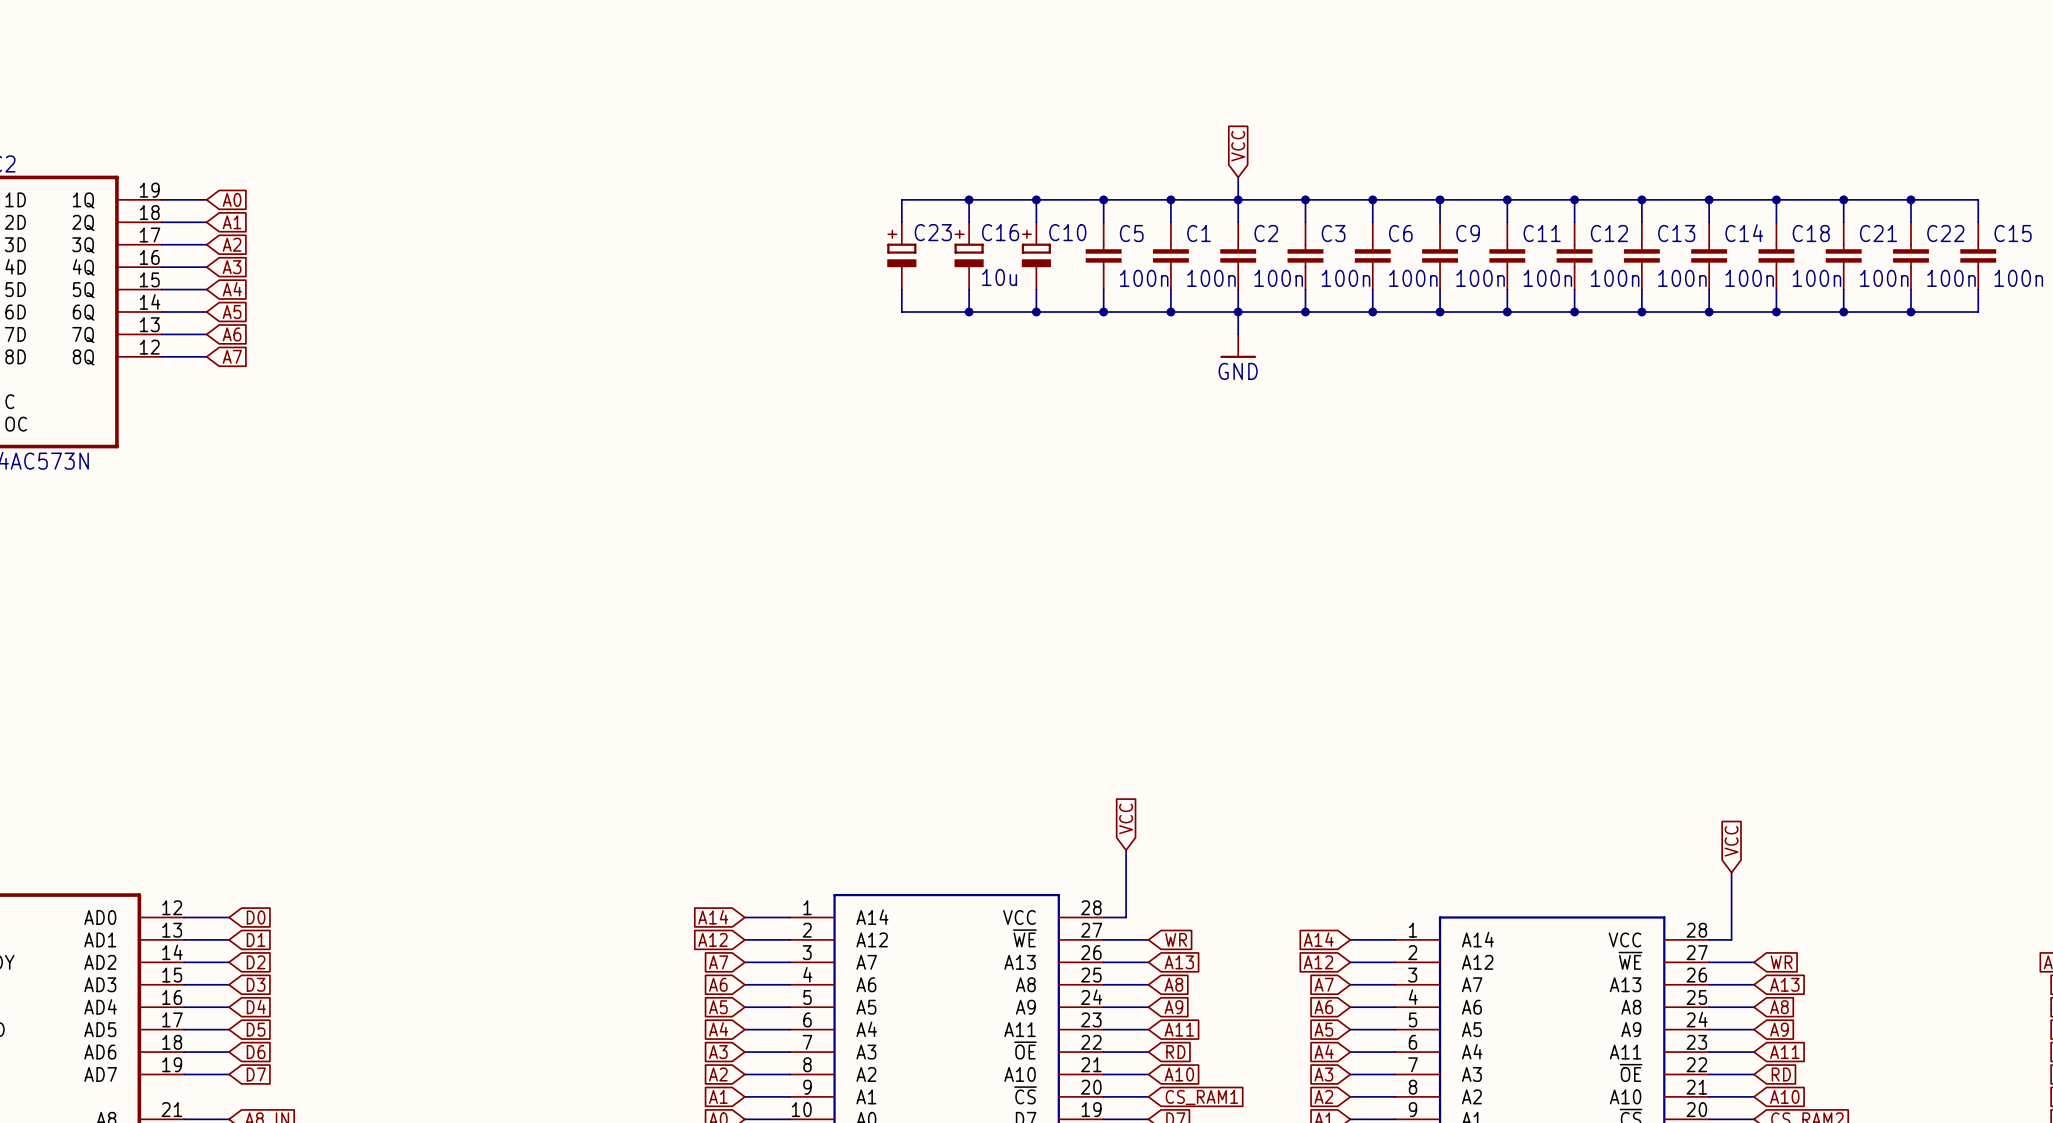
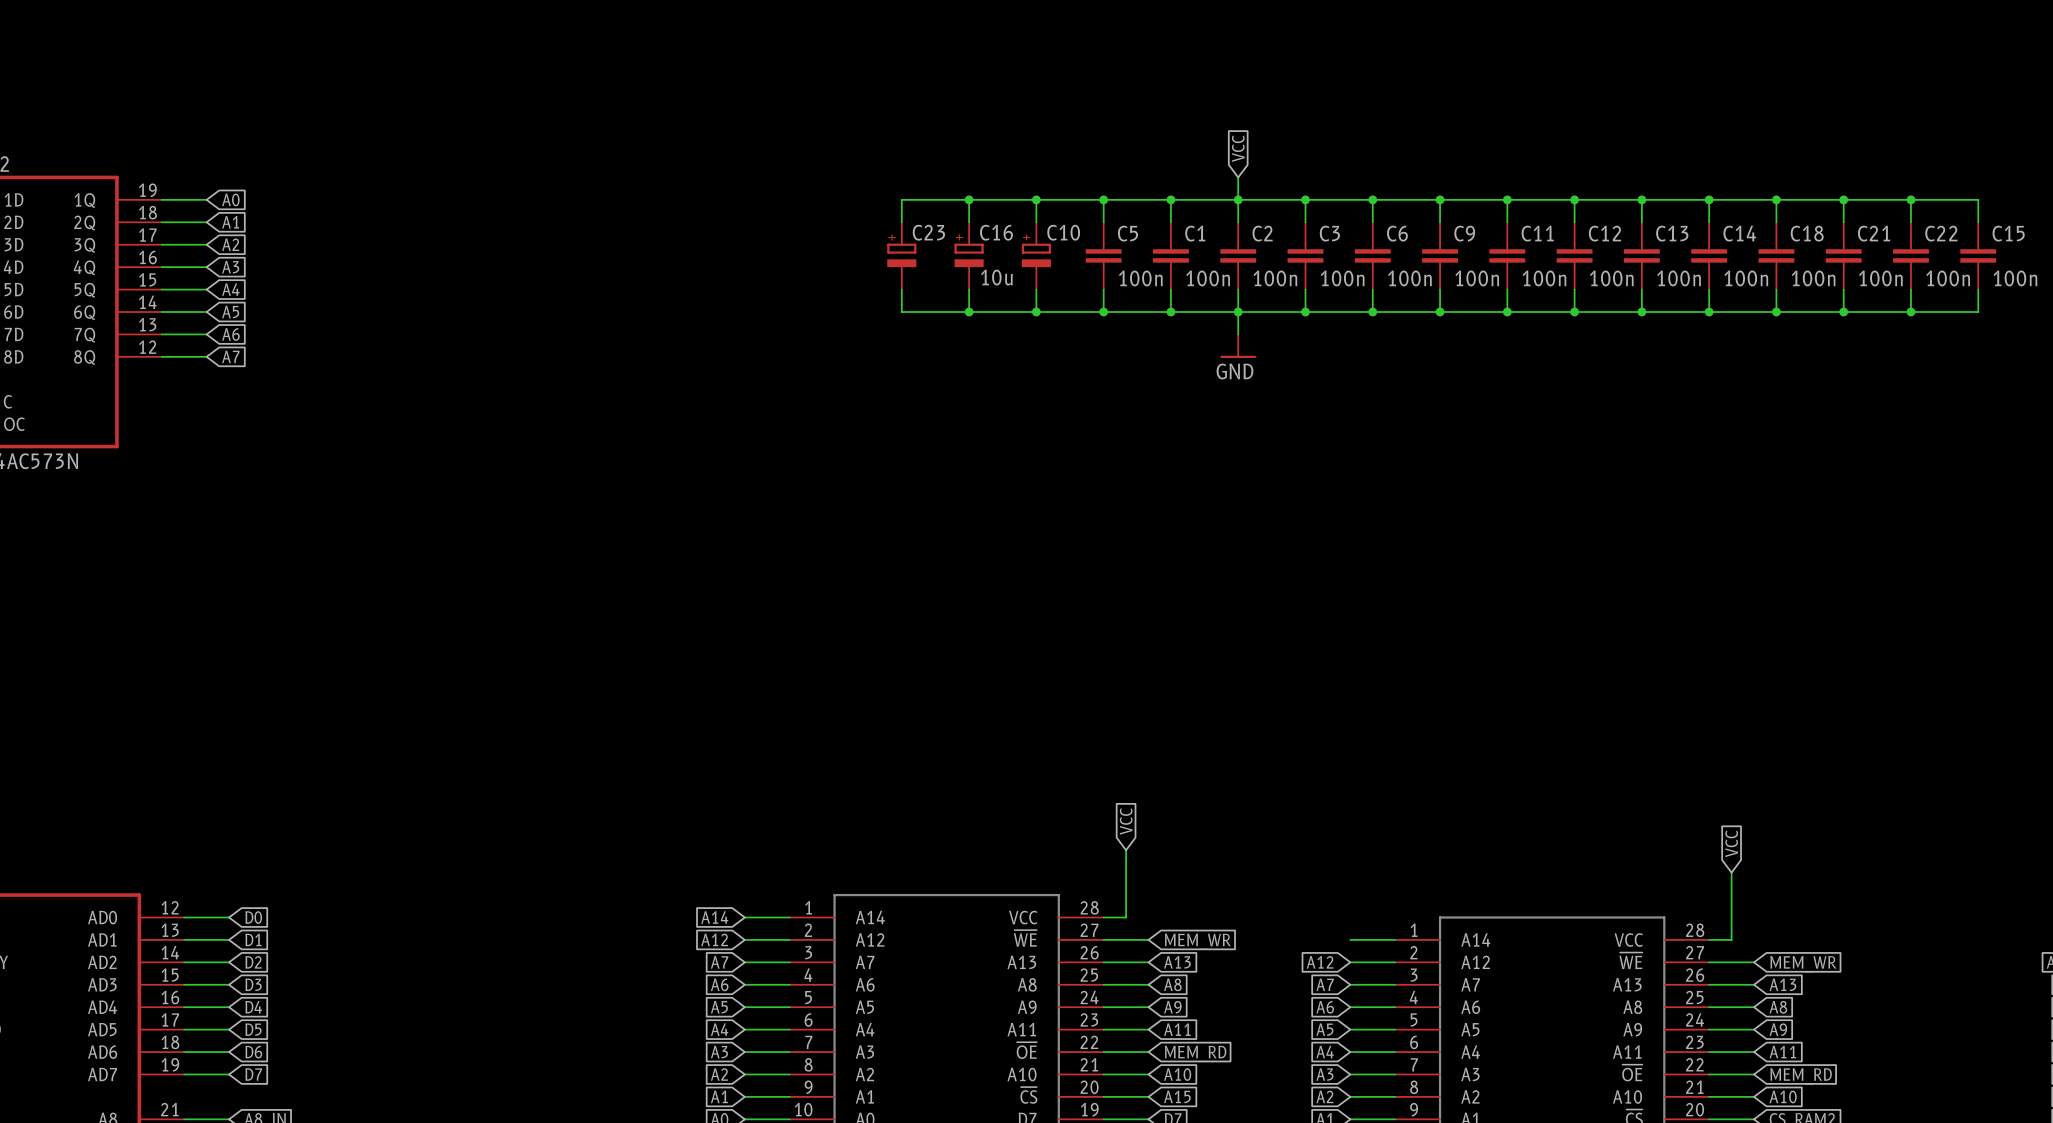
global label: WR (1176, 939) -> MEM_WR (1197, 941)
global label: A14 (1318, 939) -> none
global label: WR (1781, 962) -> MEM_WR (1803, 964)
global label: RD (1175, 1052) -> MEM_RD (1195, 1053)
global label: RD (1781, 1074) -> MEM_RD (1801, 1076)
global label: CS_RAM1 (1201, 1097) -> A15 (1177, 1096)

